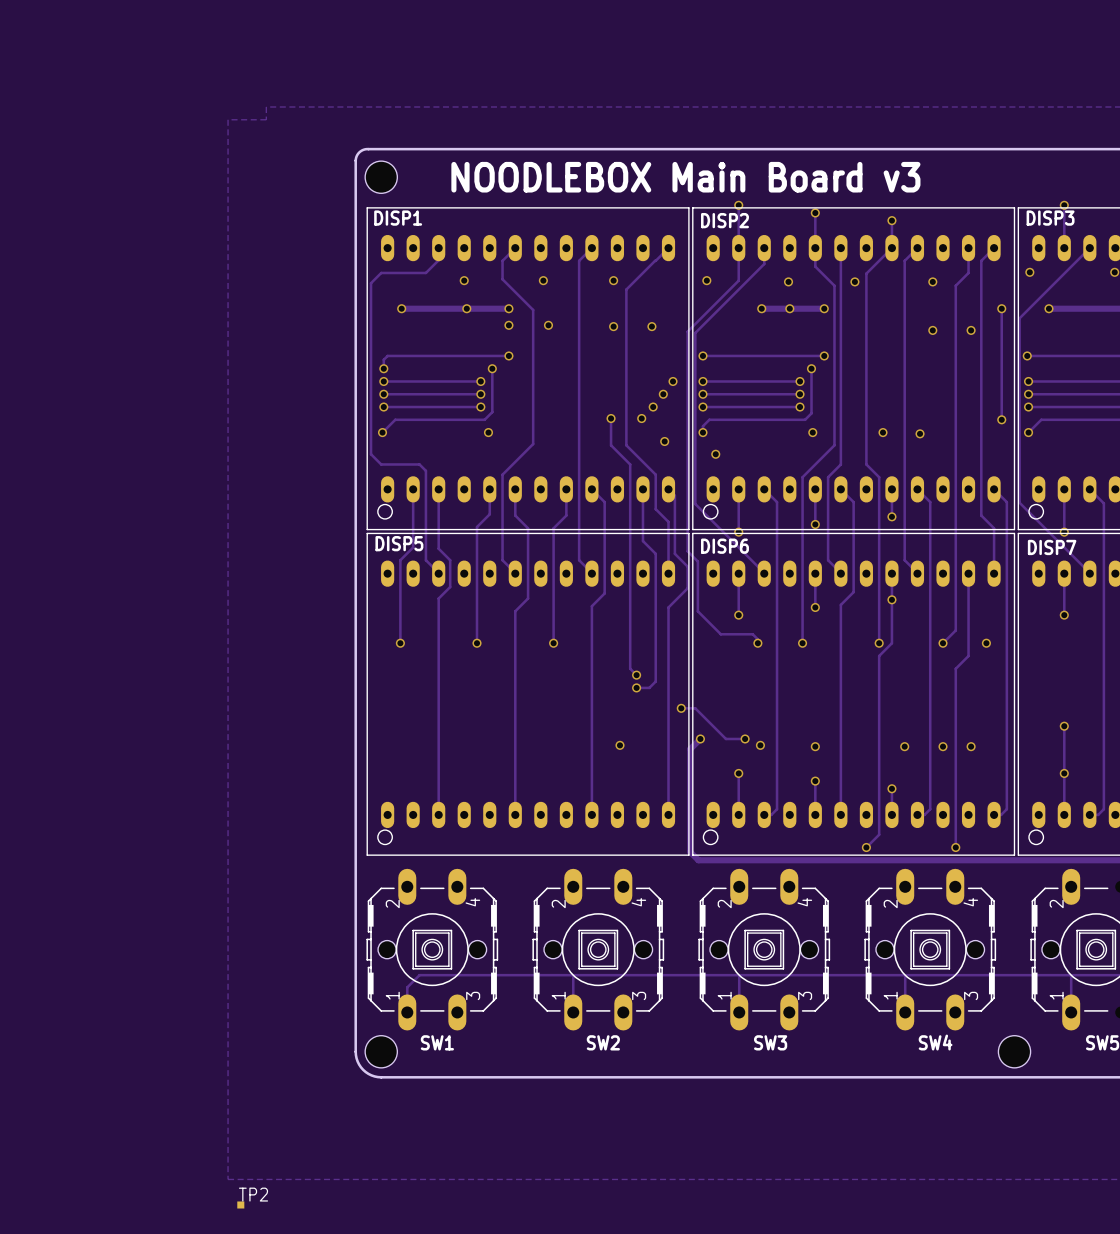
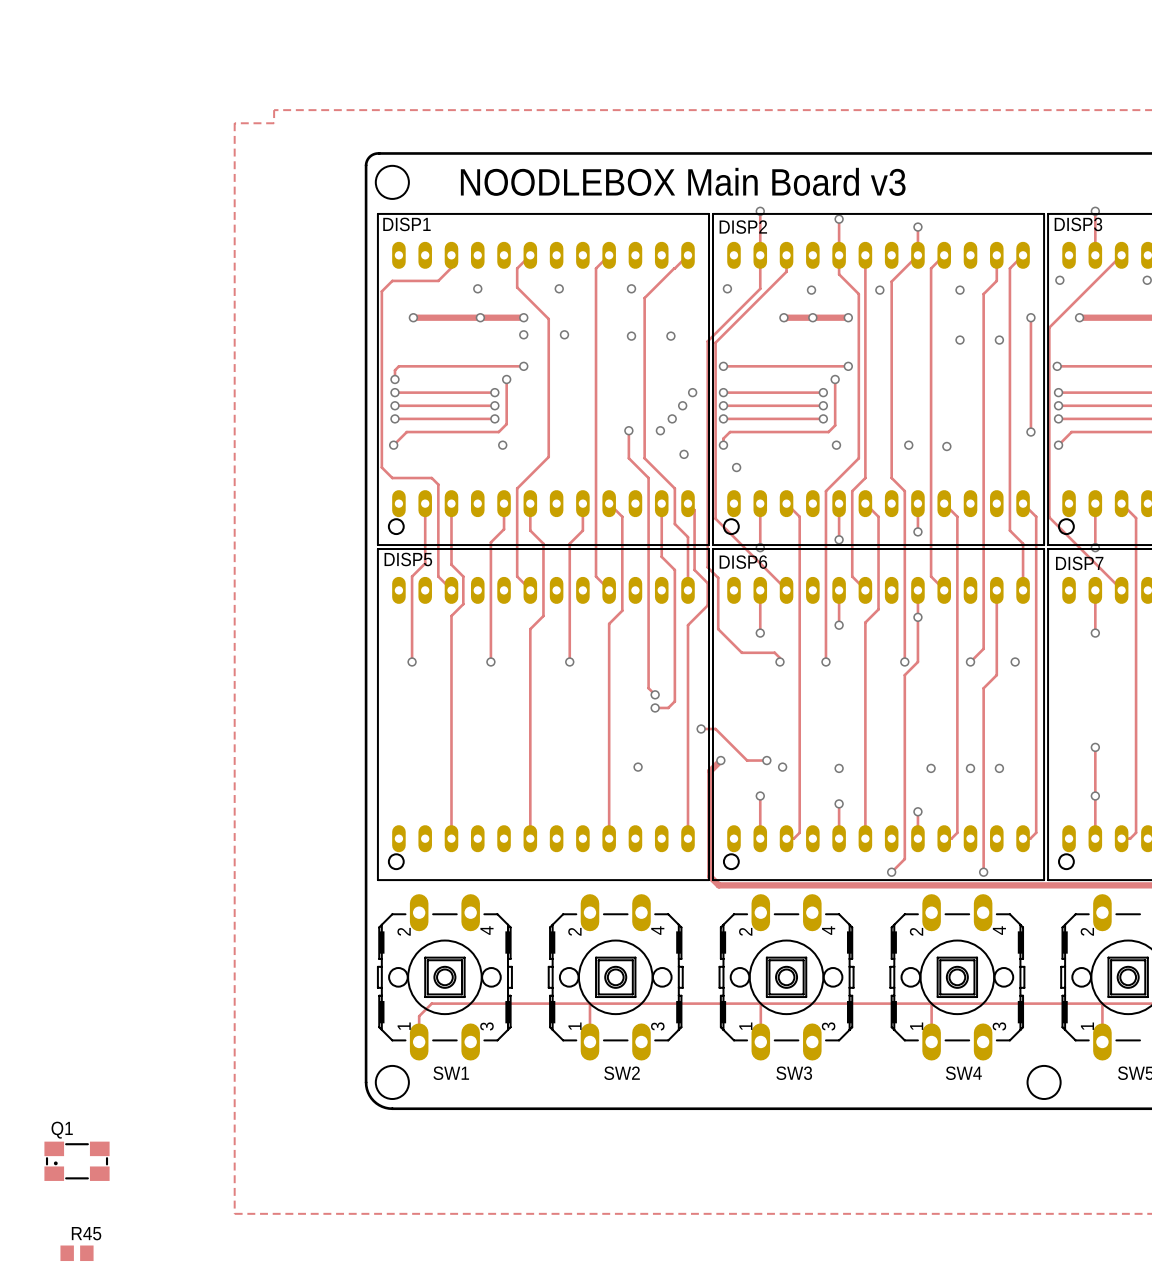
Q1: none -> (77, 1161)
TP2: (240, 1204) -> none
R45: none -> (77, 1253)

